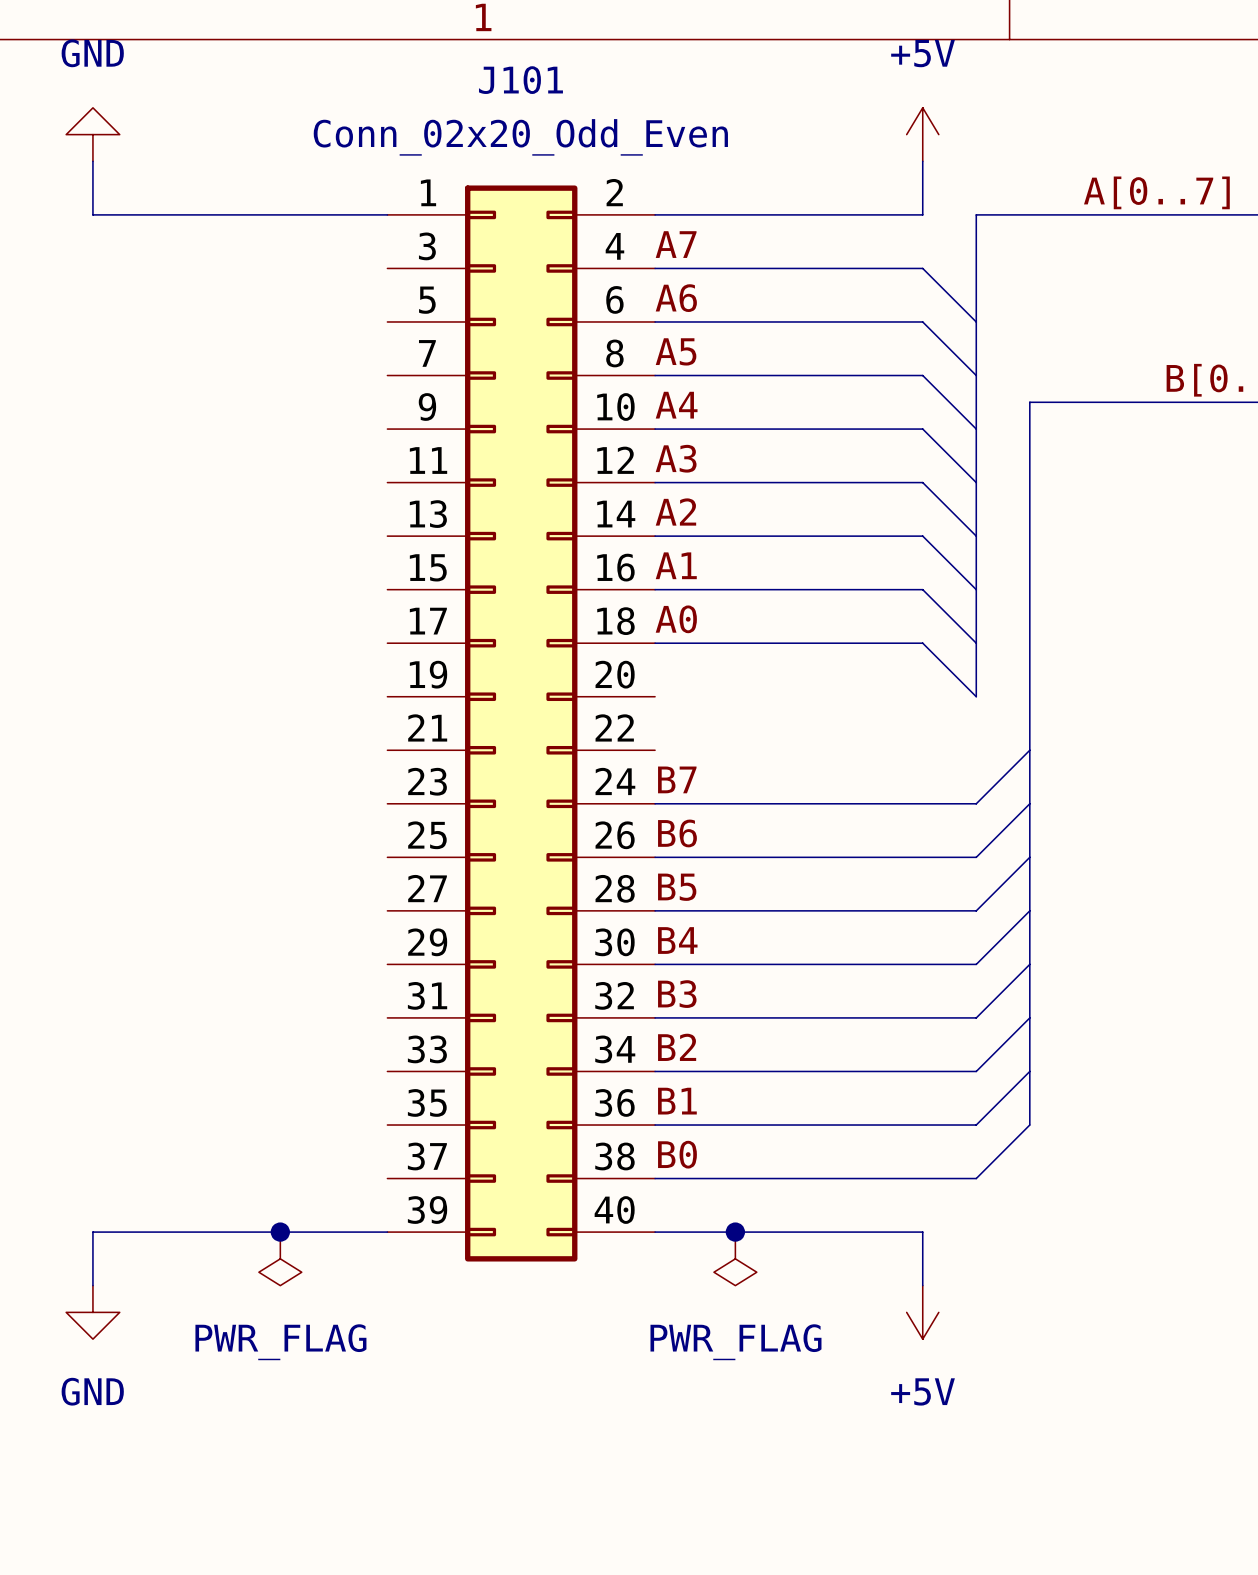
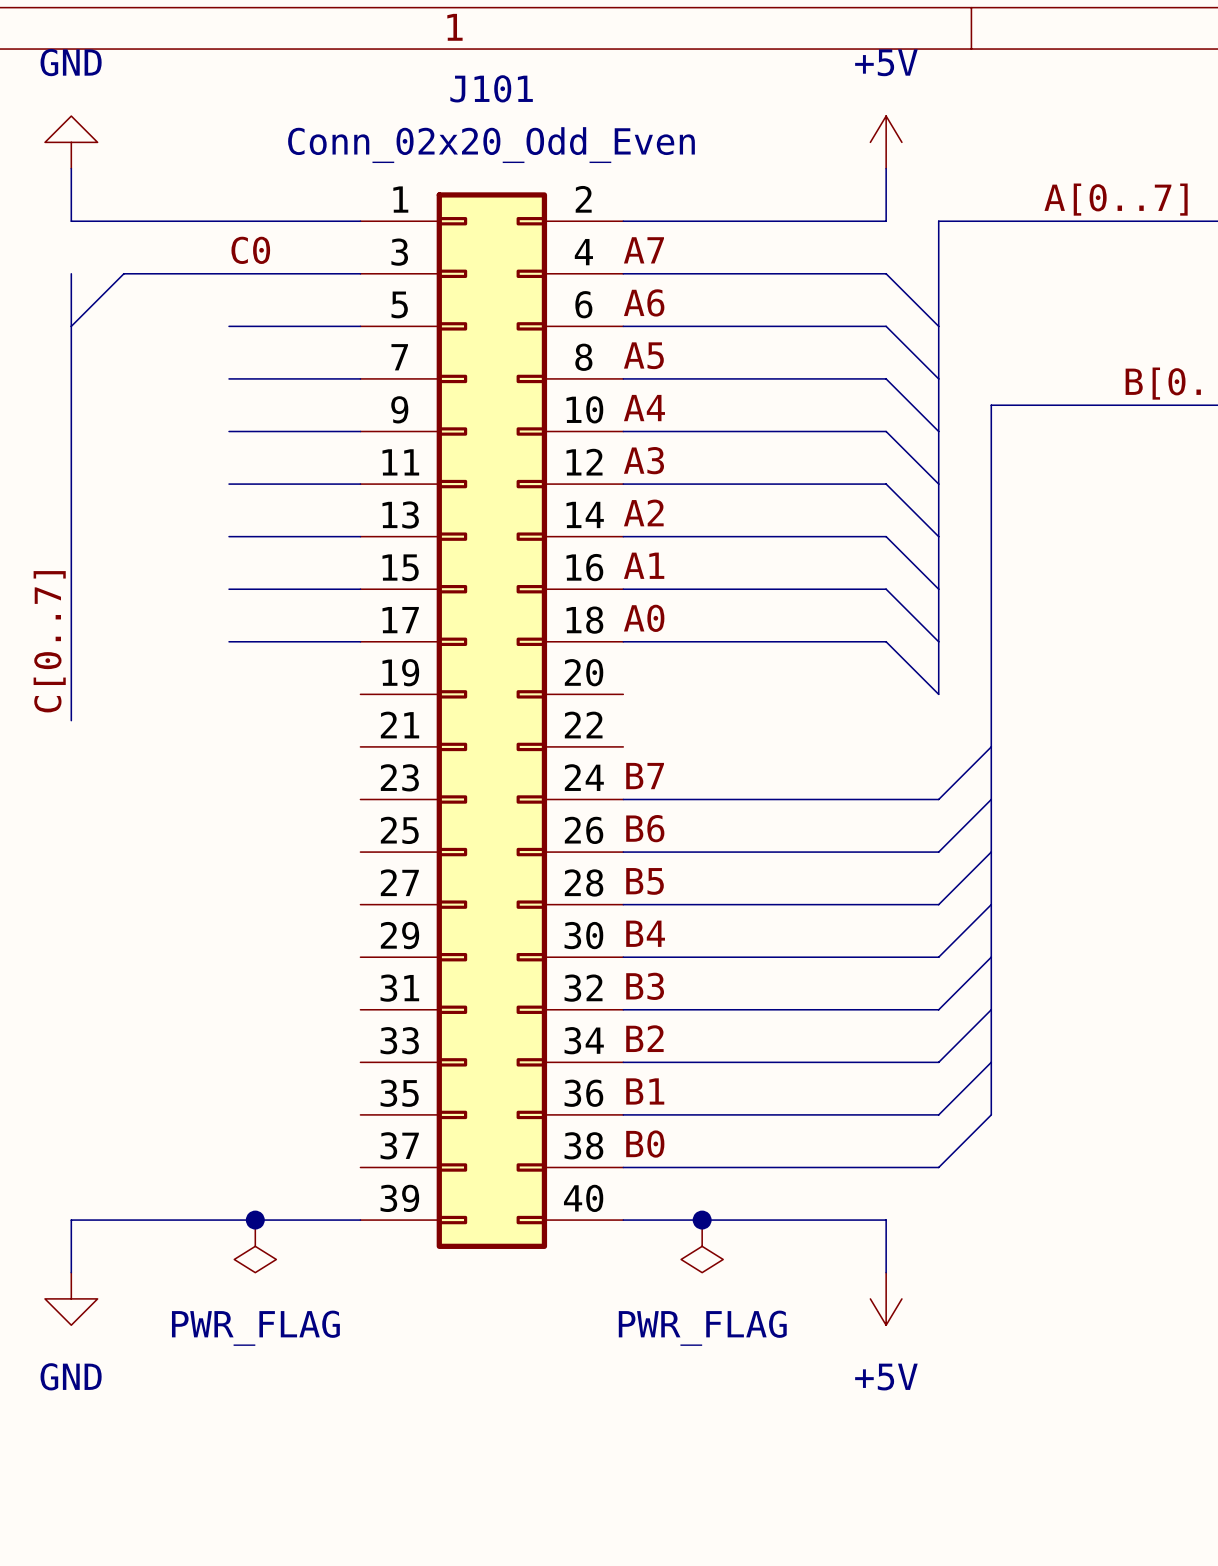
label: none -> C0 (250, 250)
bus: none -> (71, 273) (71, 720)
wire: none -> (360, 273) (123, 273) (71, 326)
wire: none -> (229, 326) (360, 326)
wire: none -> (229, 378) (360, 378)
wire: none -> (229, 431) (360, 431)
wire: none -> (229, 484) (360, 484)
wire: none -> (229, 536) (360, 536)
wire: none -> (229, 589) (360, 589)
label: none -> C[0..7] (49, 641)
wire: none -> (229, 641) (360, 641)

